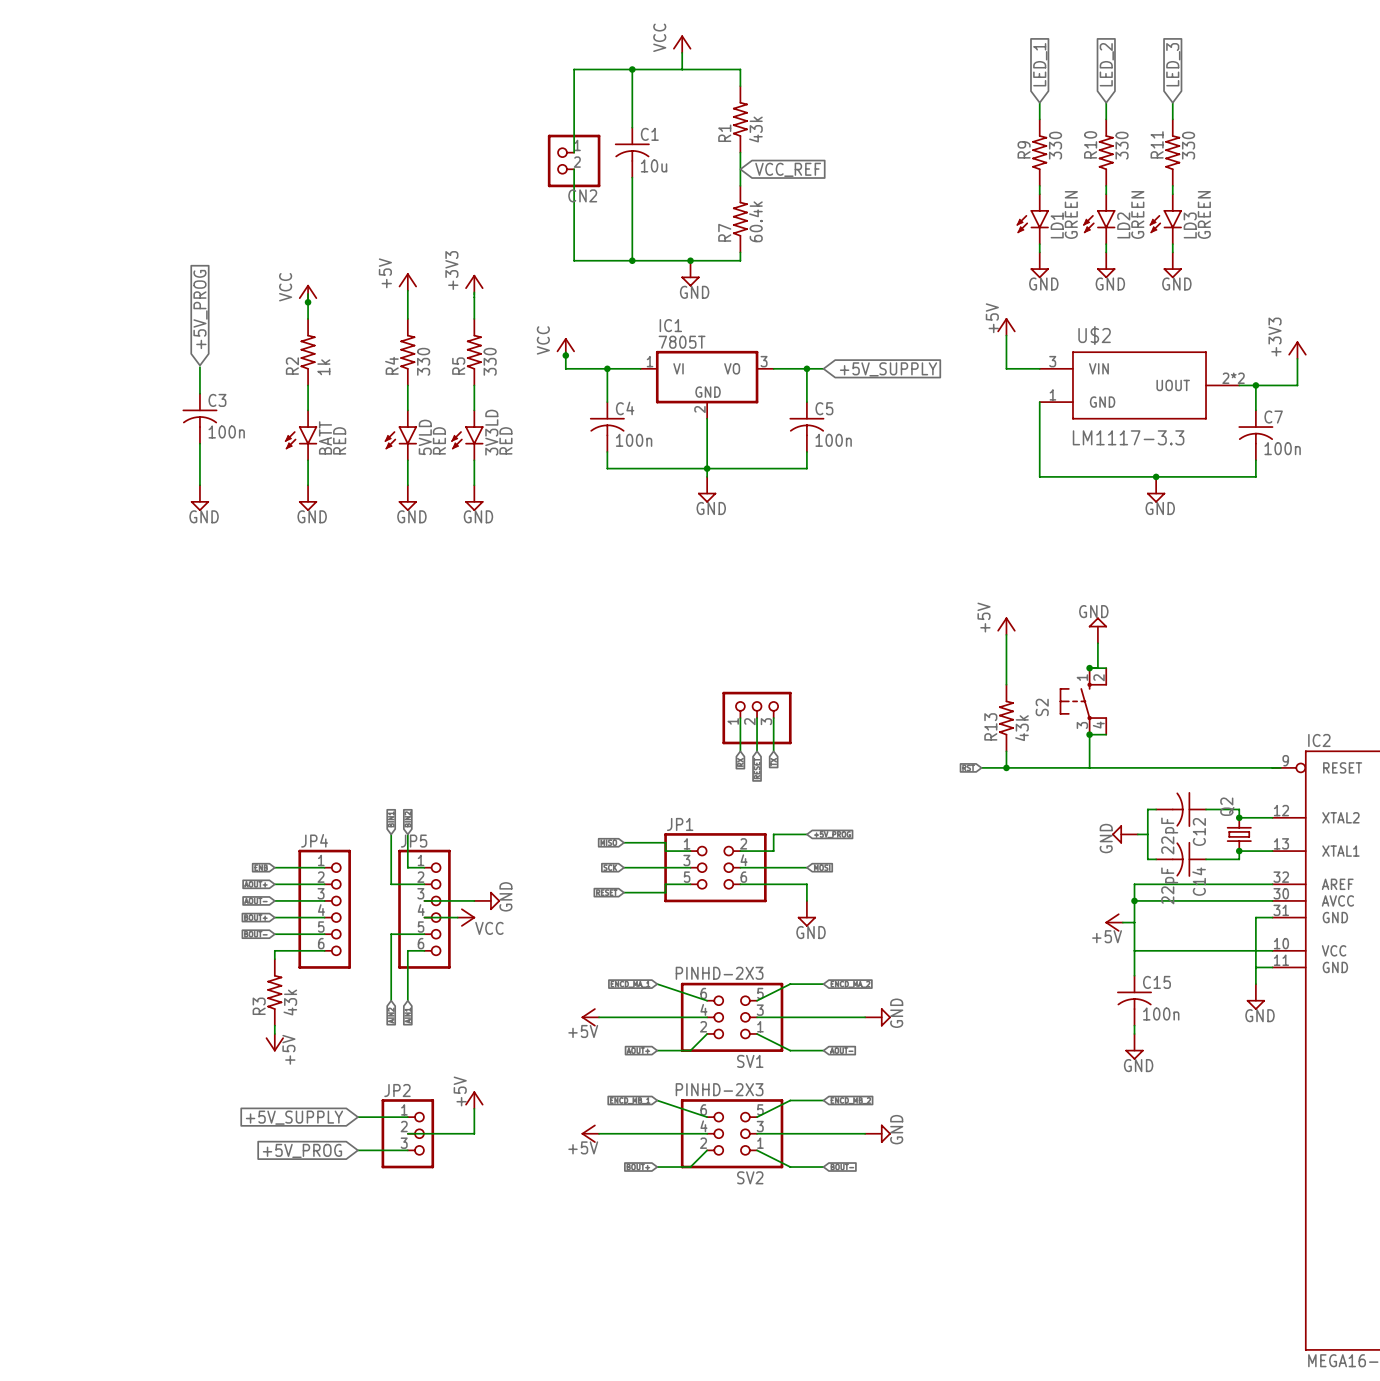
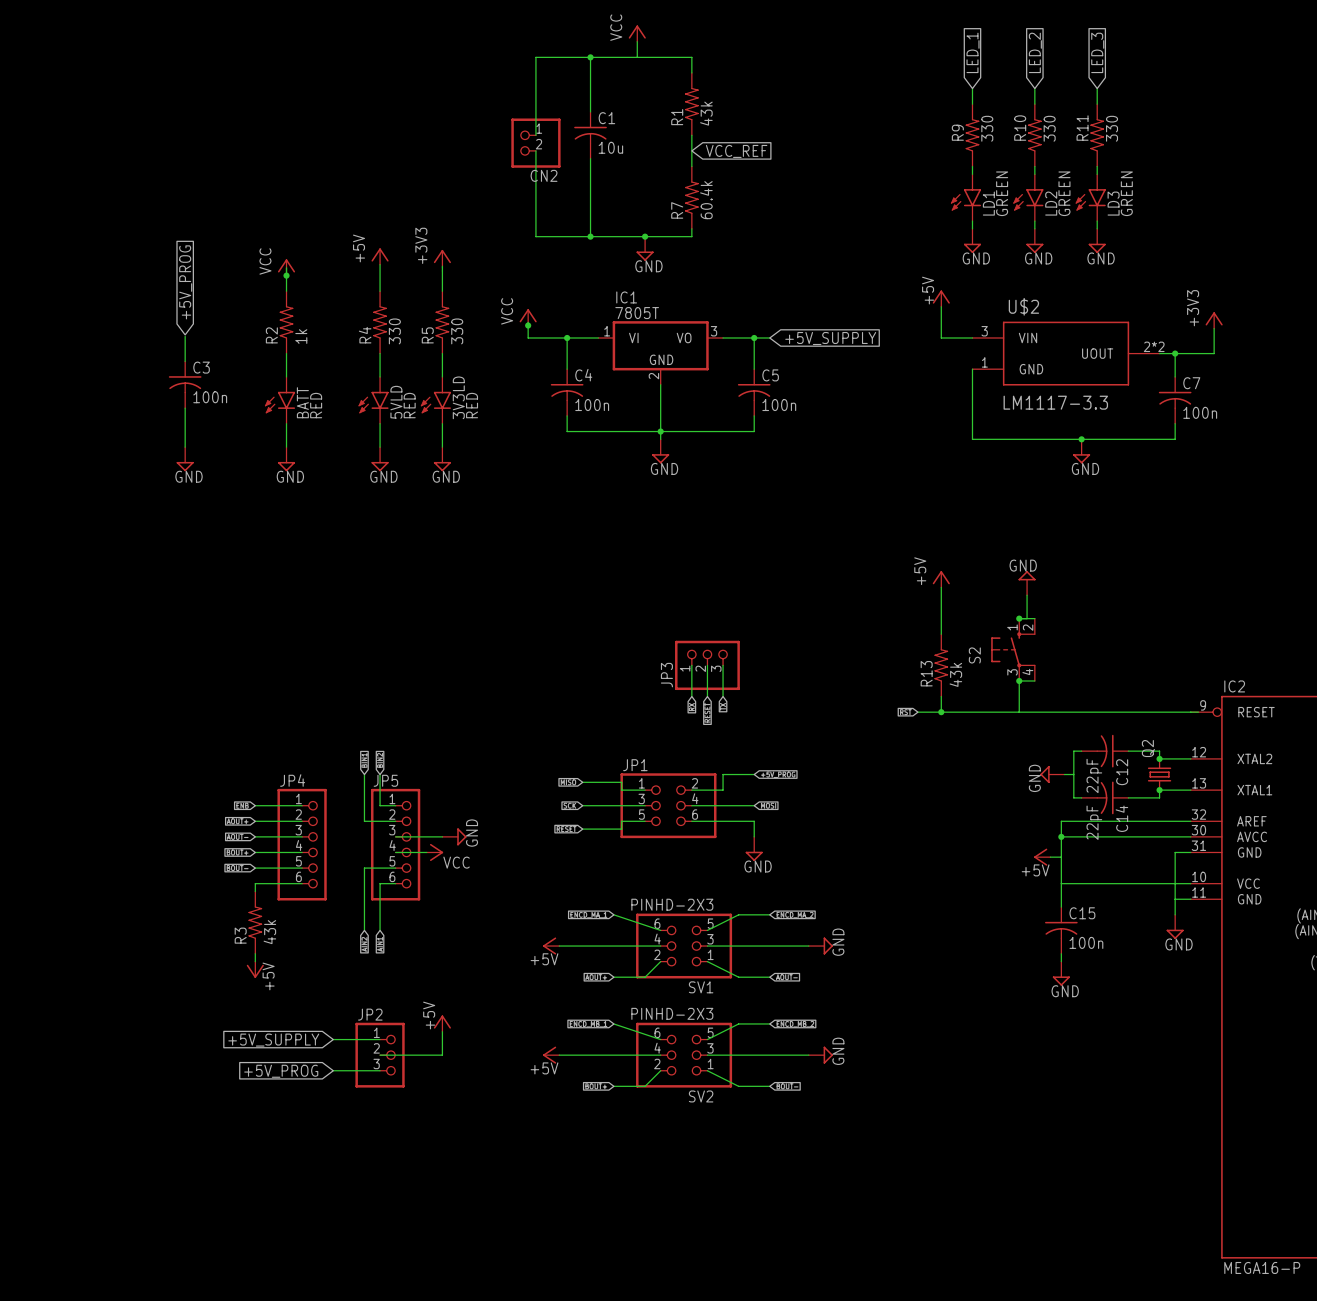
JP3 name: none -> JP3 (666, 675)

